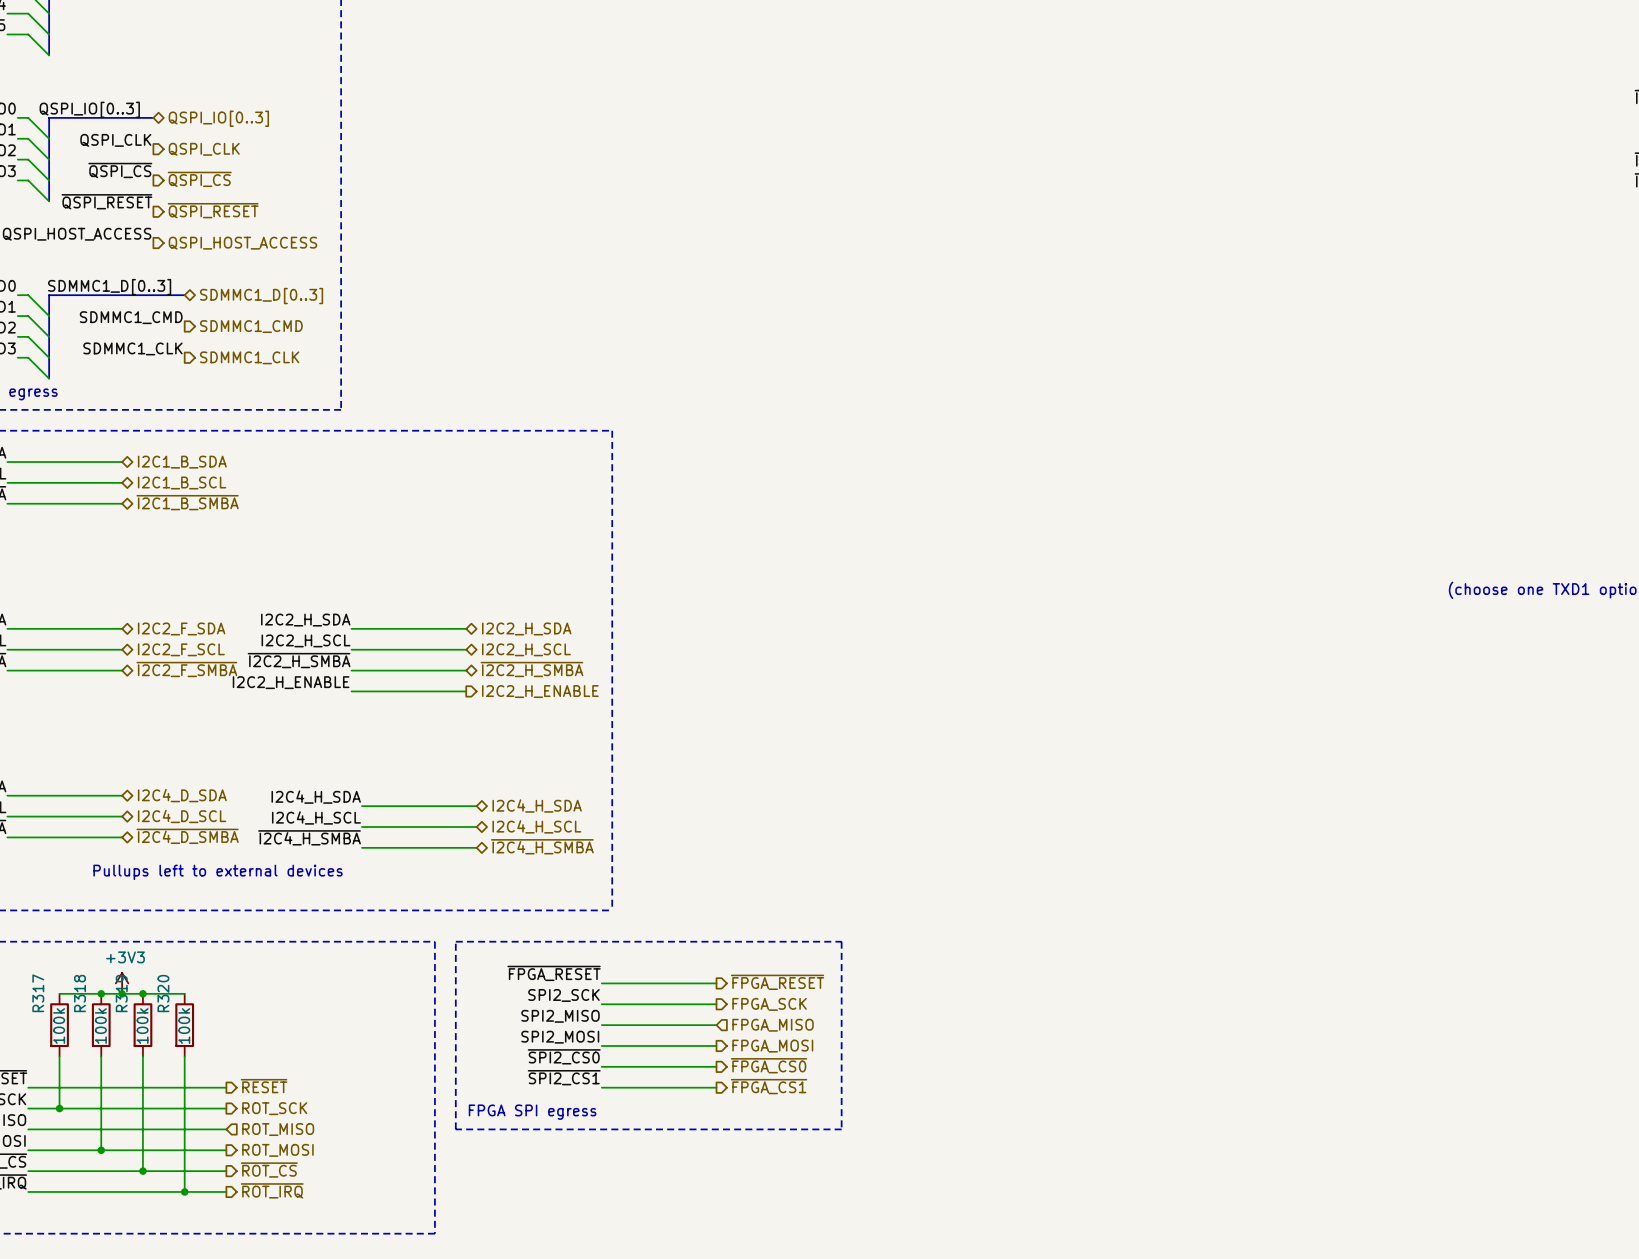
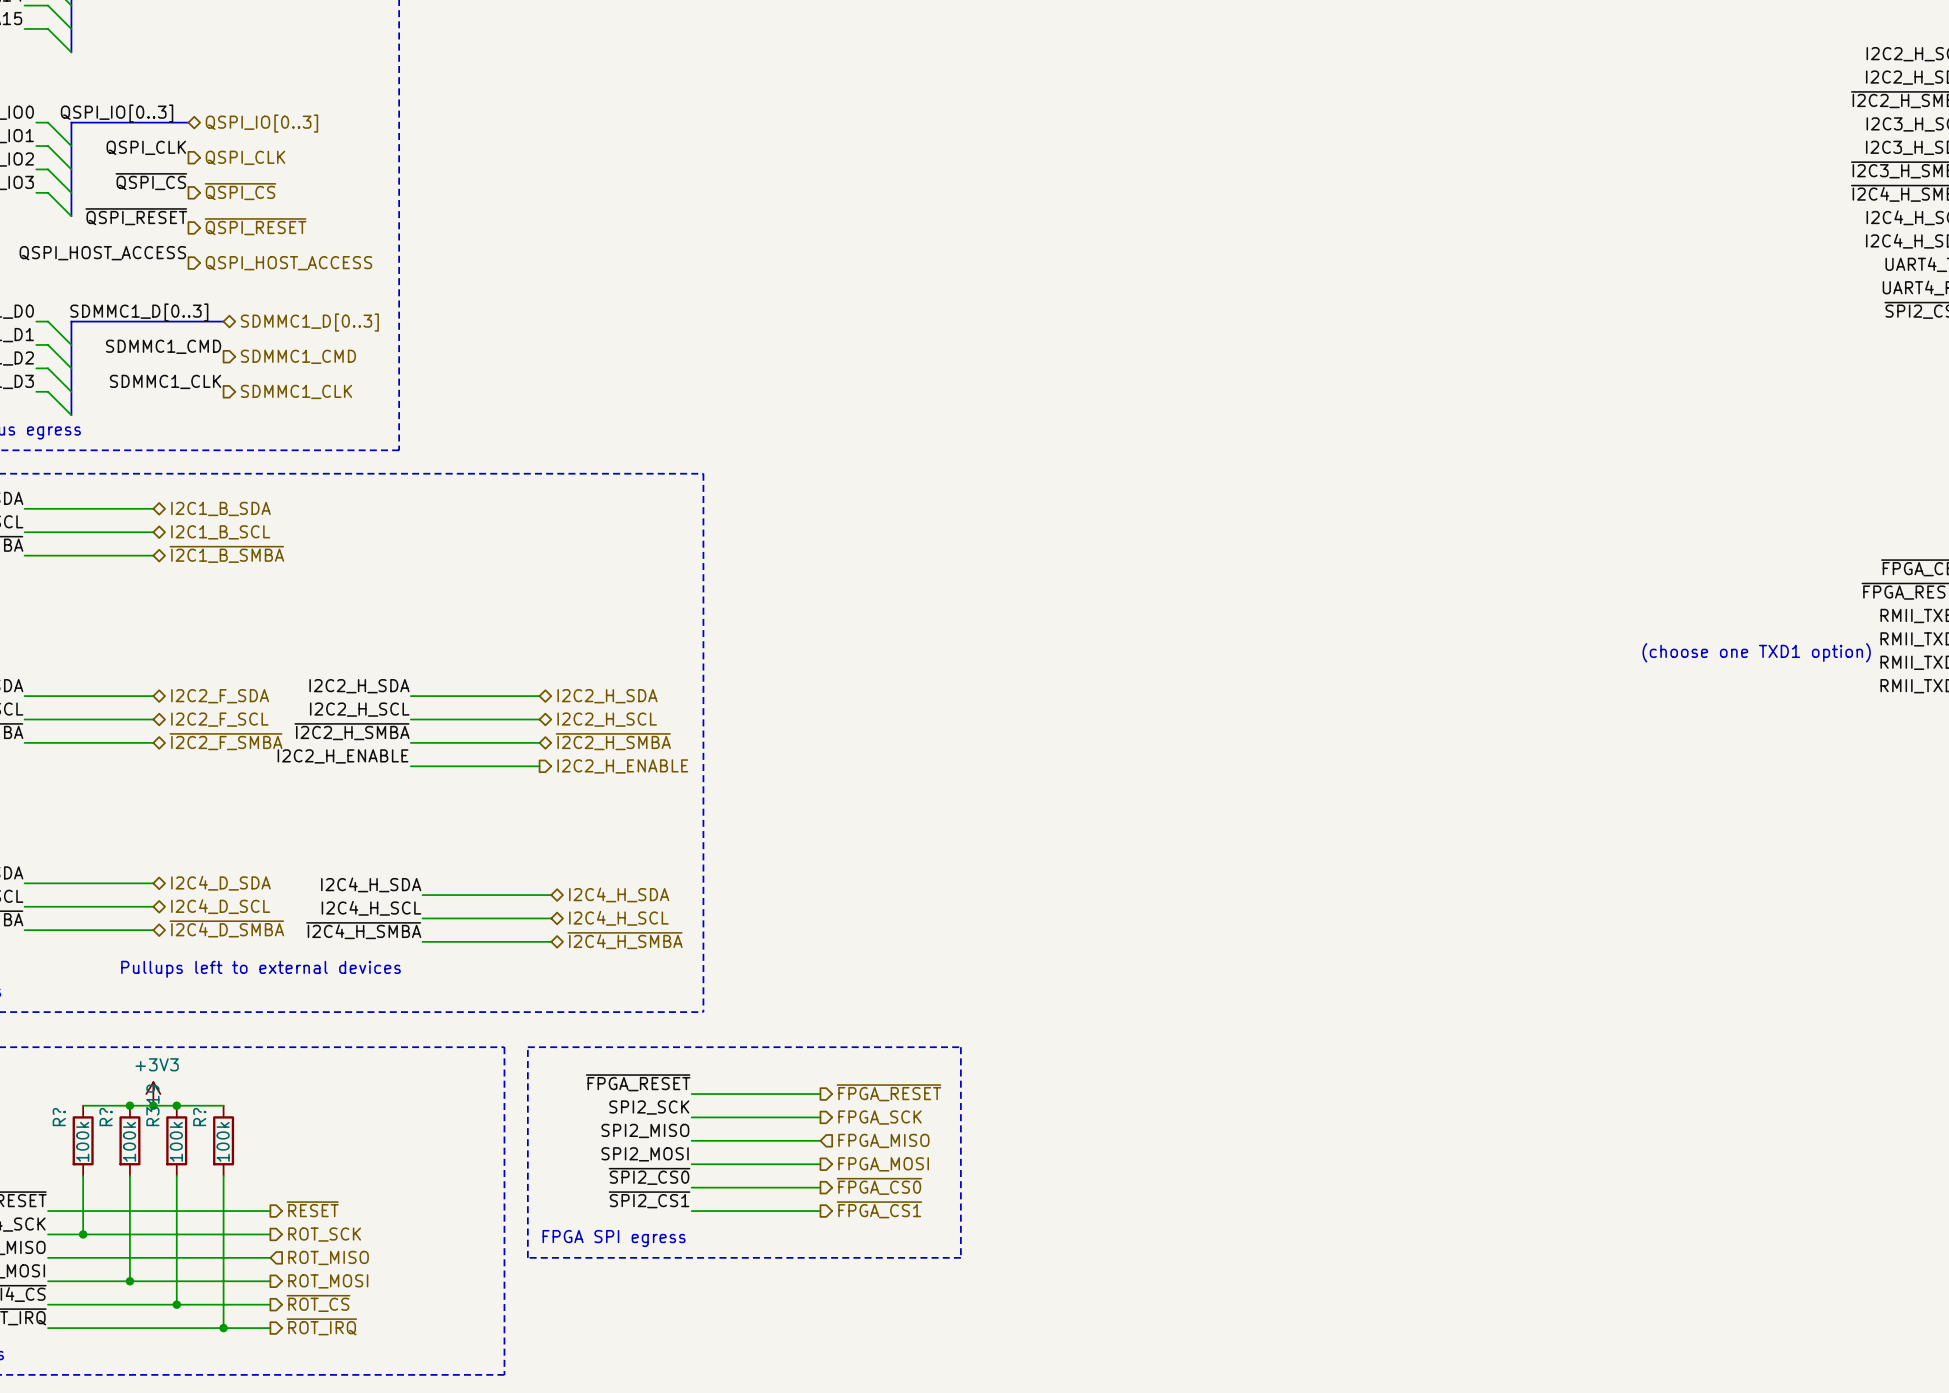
R317 name: R317 (38, 993) -> R? (59, 1117)
R318 name: R318 (80, 993) -> R? (106, 1117)
R320 name: R320 (163, 993) -> R? (199, 1117)

